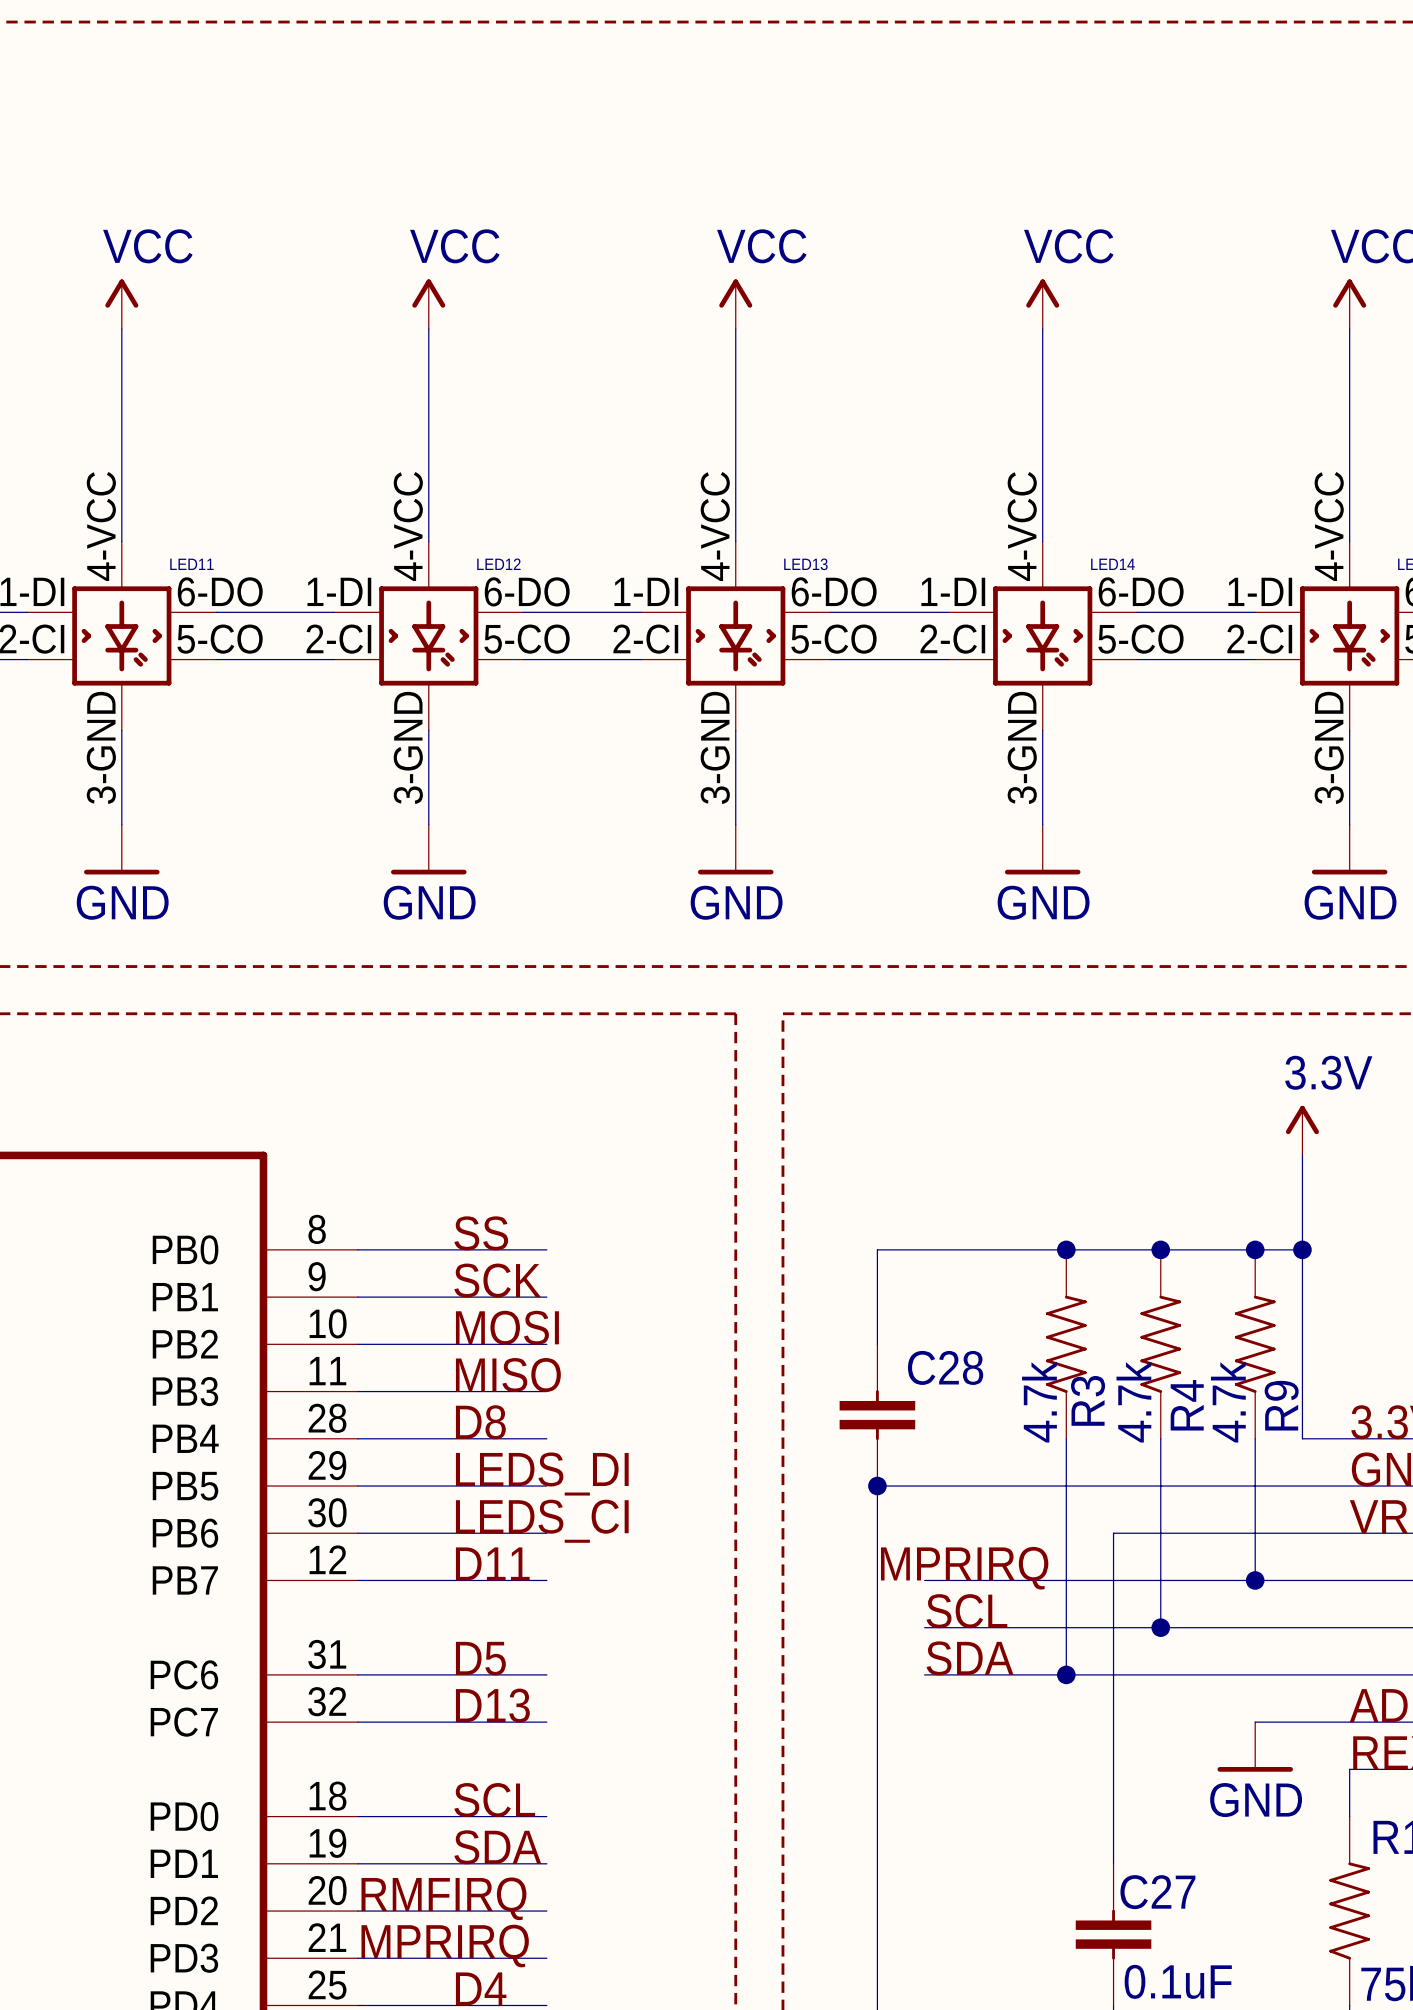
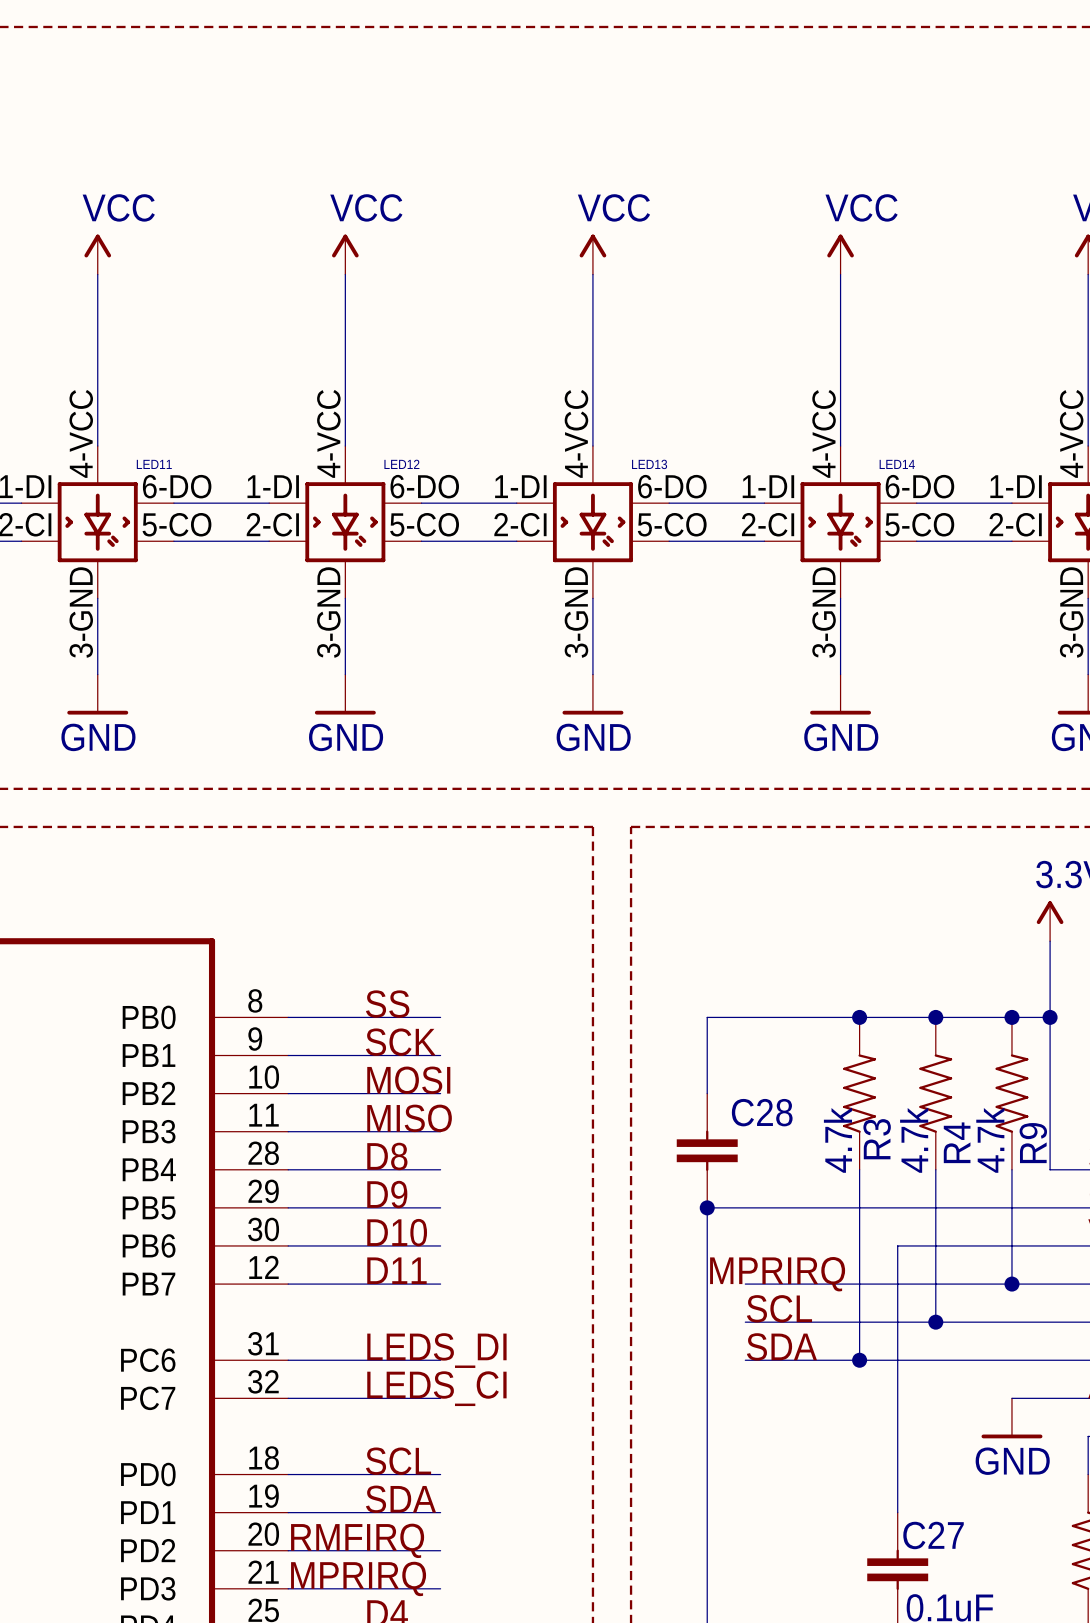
label: LEDS_DI (542, 1474) -> D9 (387, 1194)
label: LEDS_CI (542, 1521) -> D10 (397, 1232)
label: D5 (480, 1658) -> LEDS_DI (436, 1350)
label: D13 (492, 1705) -> LEDS_CI (436, 1388)

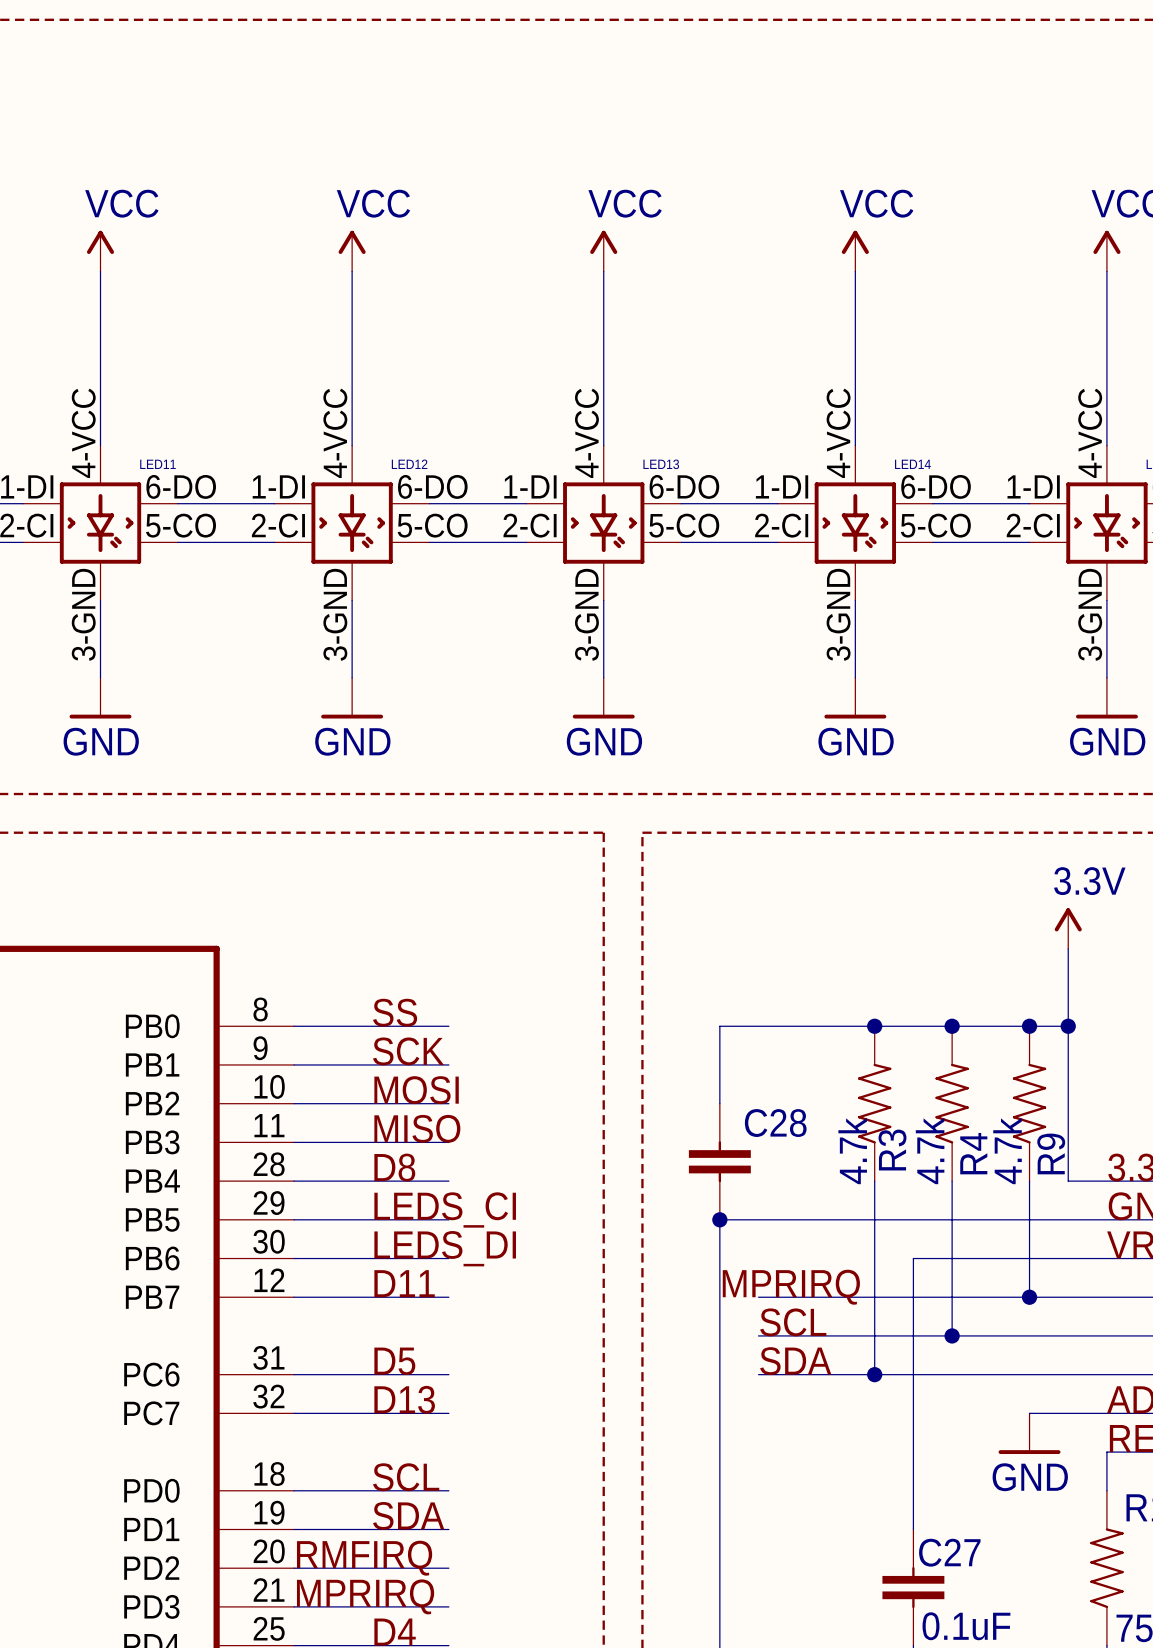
label: D9 (387, 1194) -> LEDS_CI (445, 1209)
label: D10 (397, 1232) -> LEDS_DI (445, 1248)
label: LEDS_DI (436, 1350) -> D5 (394, 1361)
label: LEDS_CI (436, 1388) -> D13 (404, 1399)

